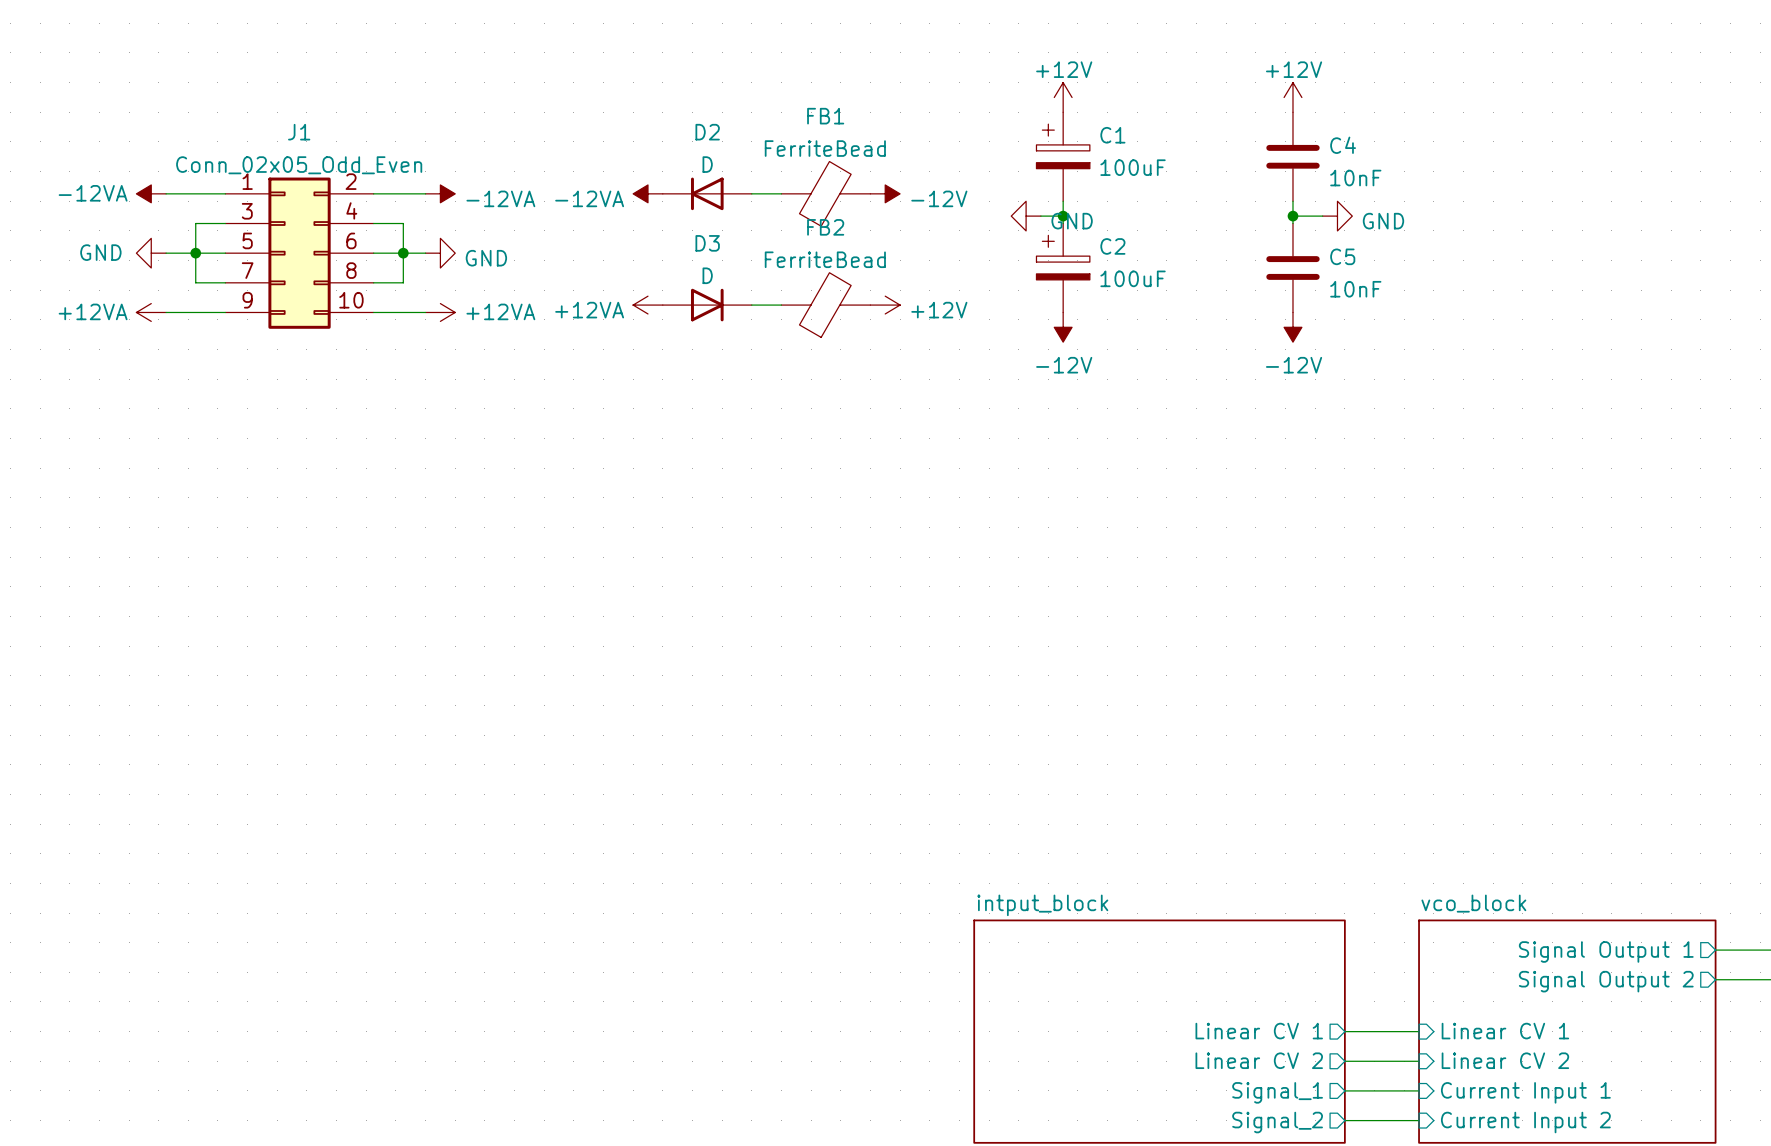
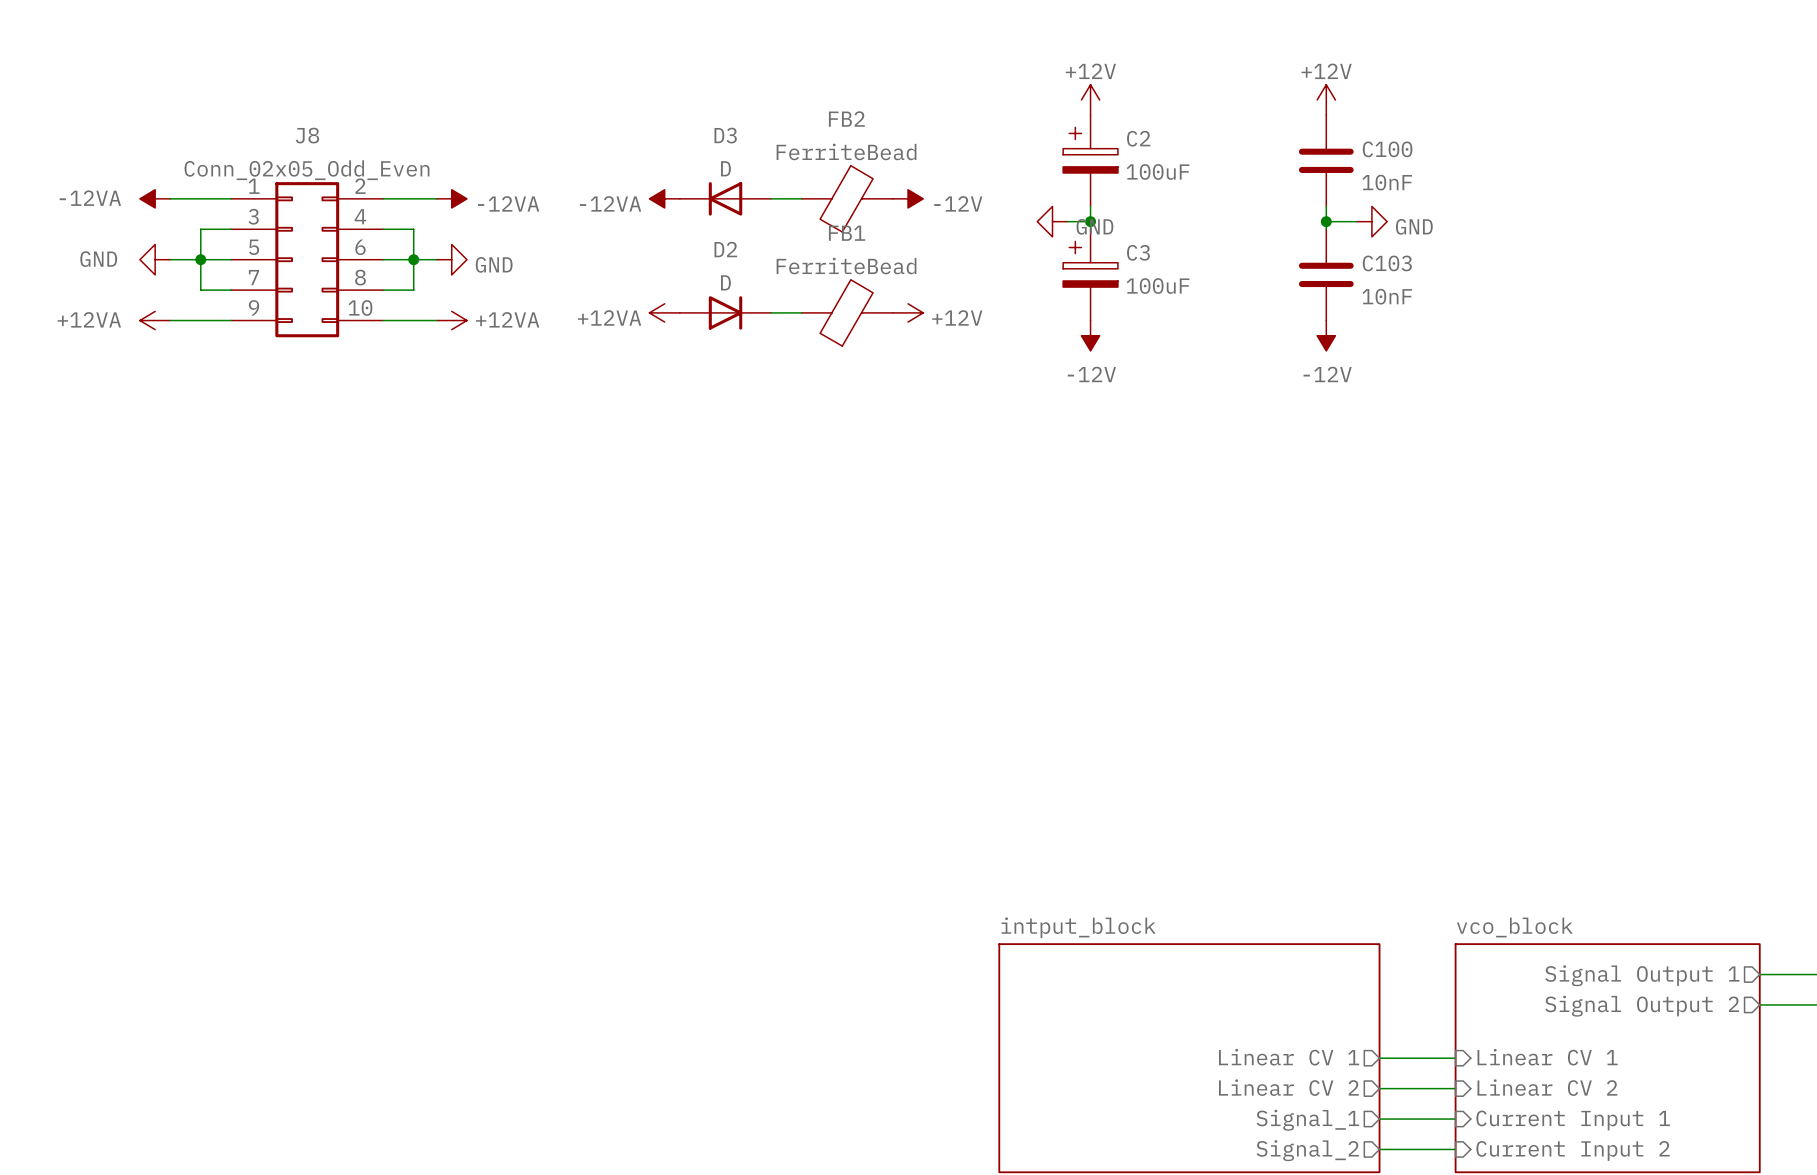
FB1 name: FB1 (825, 116) -> FB2 (846, 119)
J1 name: J1 (299, 132) -> J8 (307, 135)
D2 name: D2 (707, 132) -> D3 (725, 135)
C1 name: C1 (1112, 135) -> C2 (1138, 138)
C4 name: C4 (1343, 145) -> C100 (1387, 149)
FB2 name: FB2 (825, 227) -> FB1 (847, 233)
D3 name: D3 (707, 243) -> D2 (725, 249)
C2 name: C2 (1112, 246) -> C3 (1138, 252)
C5 name: C5 (1342, 256) -> C103 (1387, 263)

